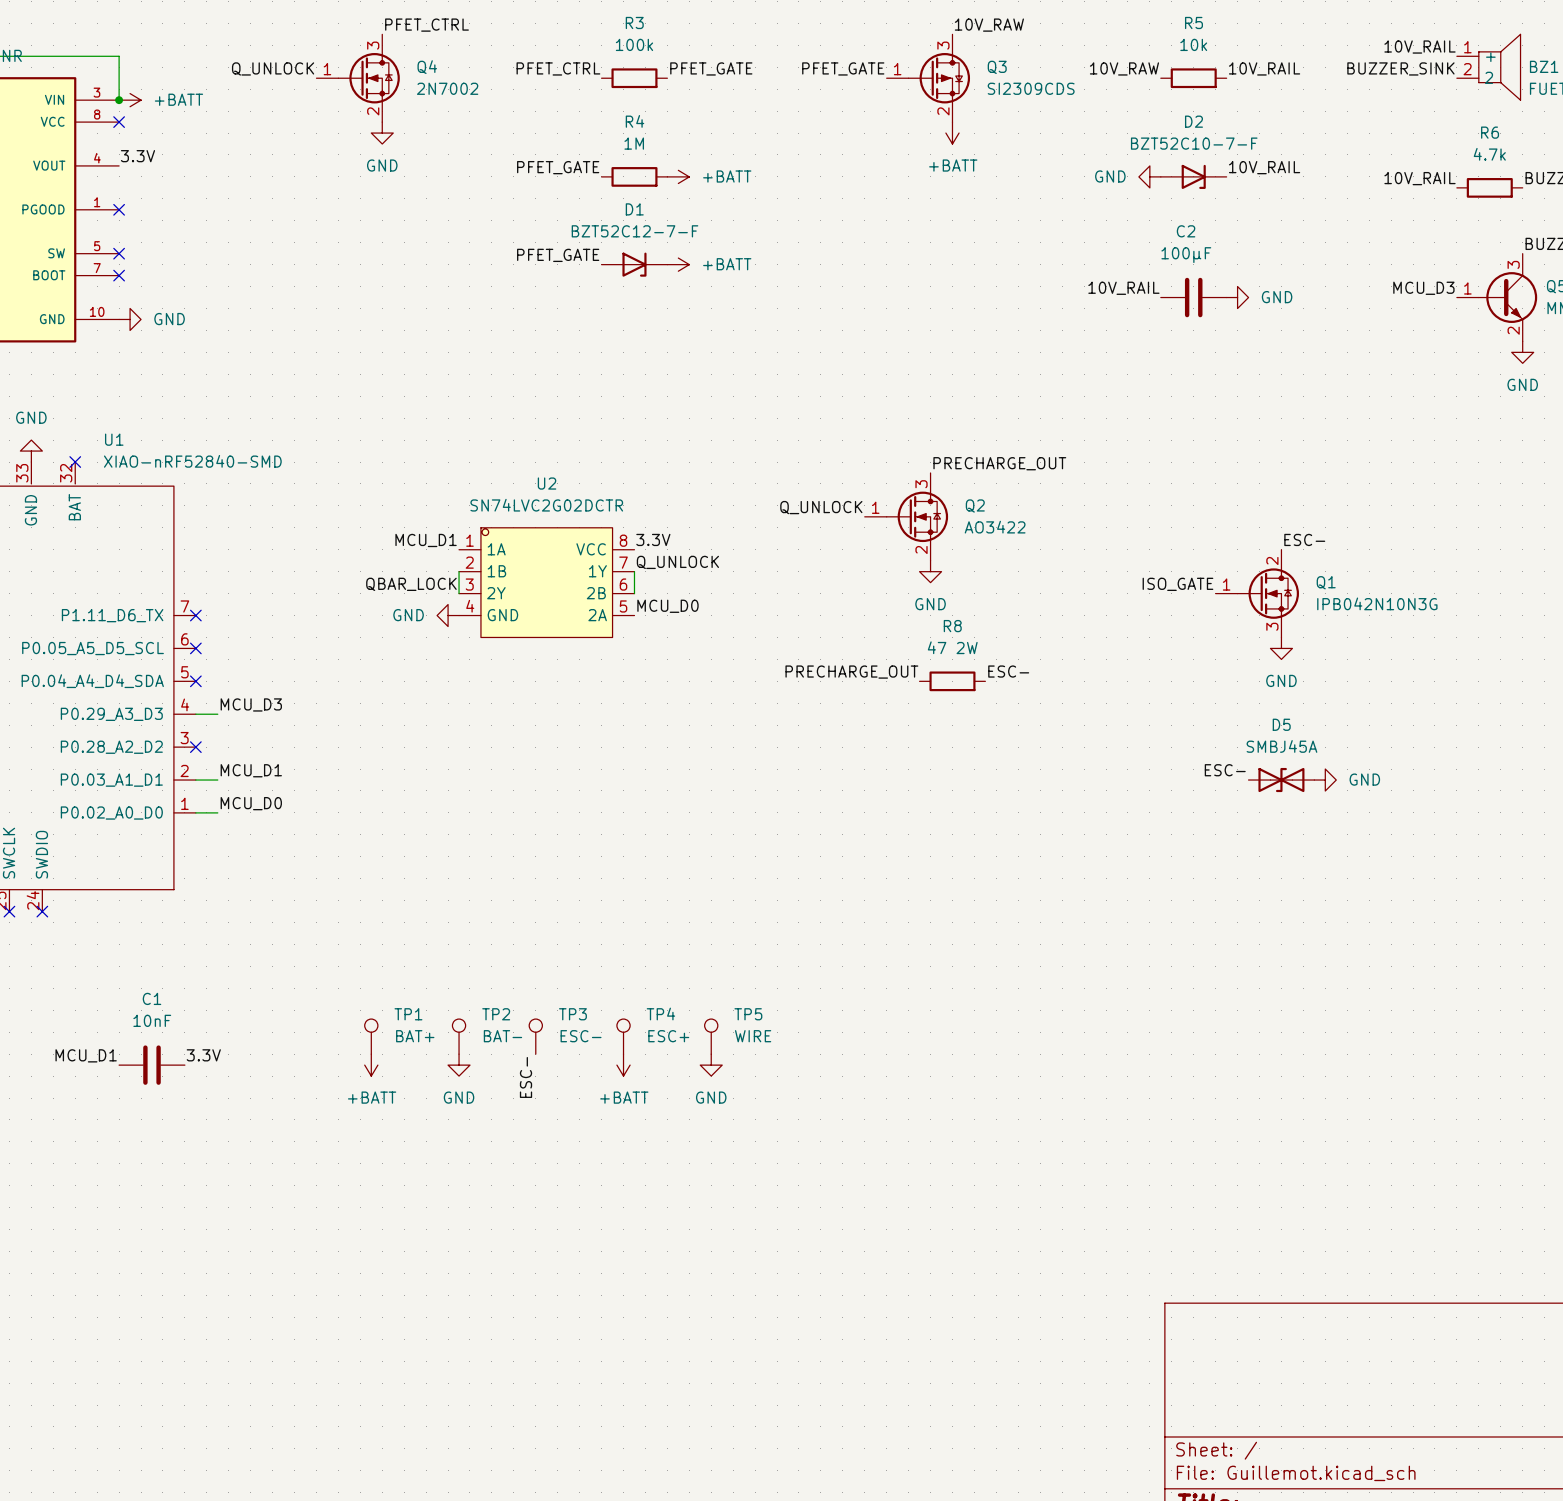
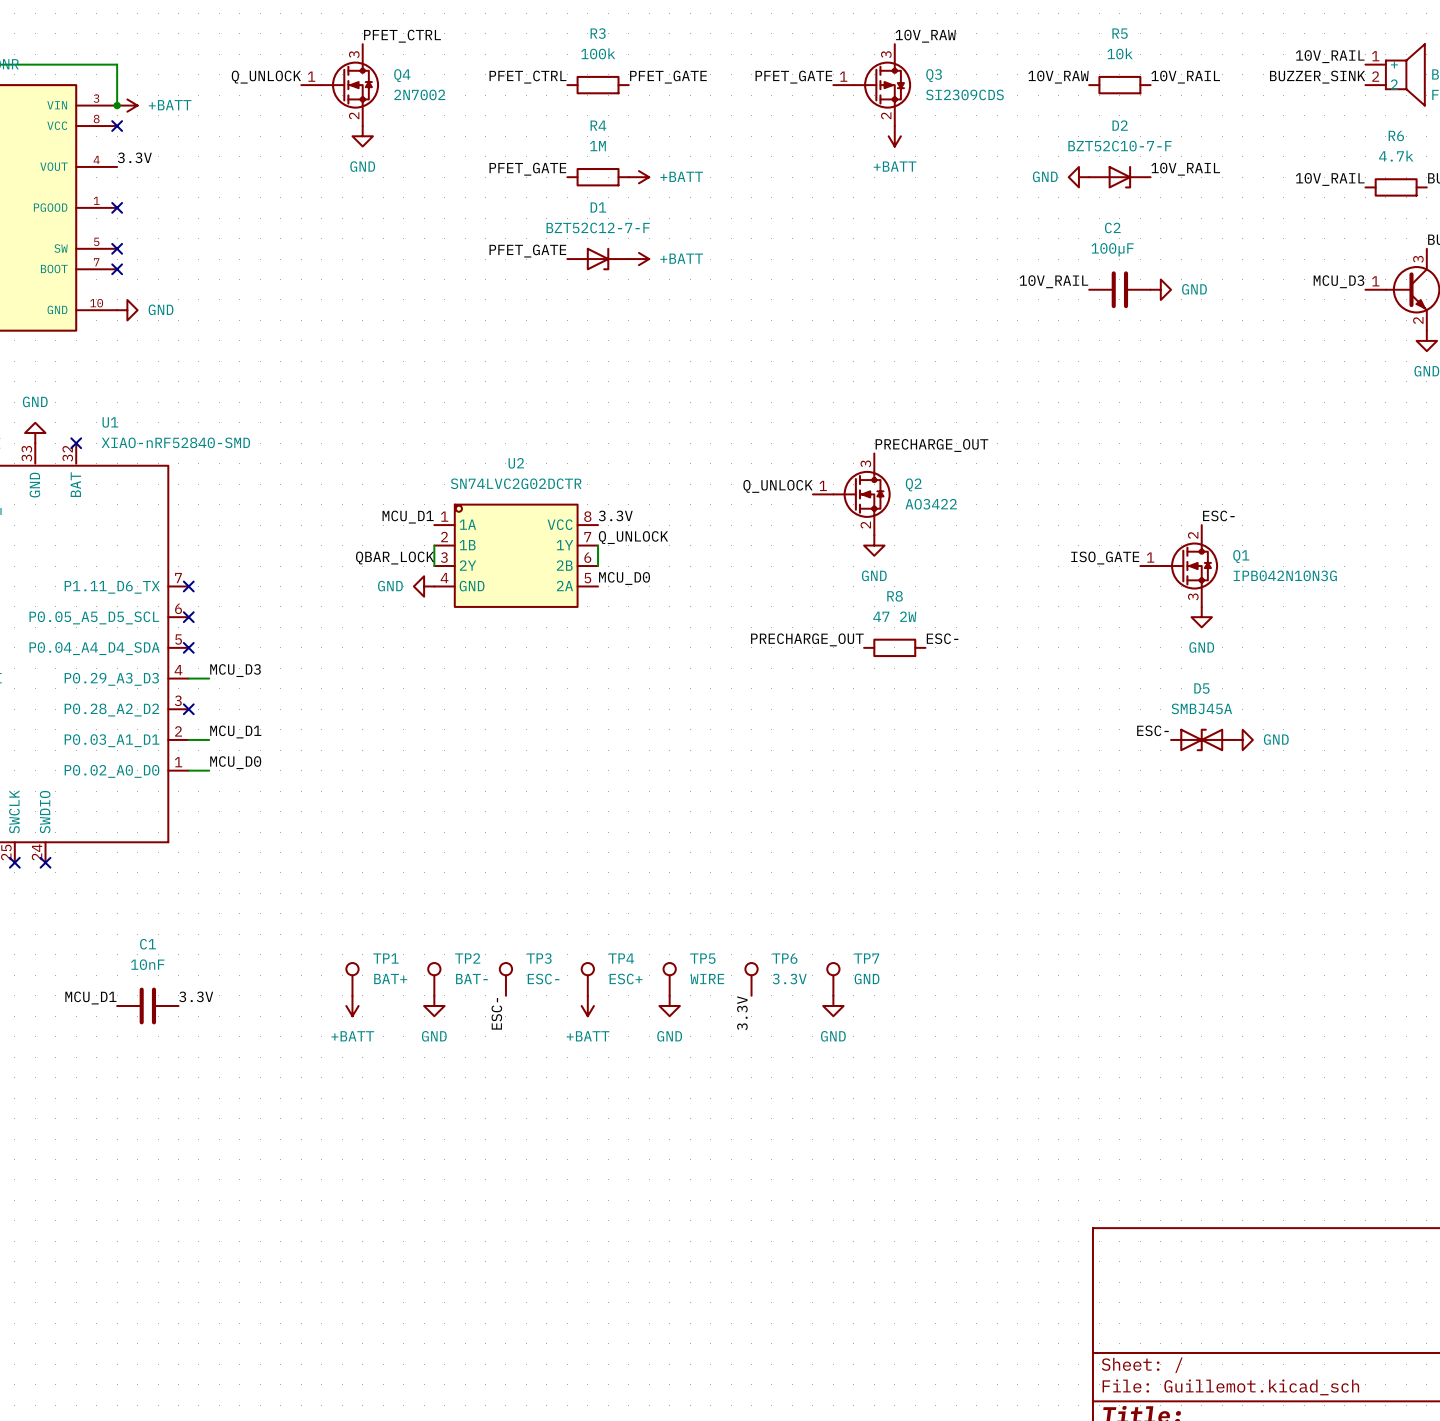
TP6: none -> 3.3V (751, 979)
TP7: none -> GND (833, 979)
power symbol: none -> GND (833, 1005)
label: none -> 3.3V (742, 1013)

